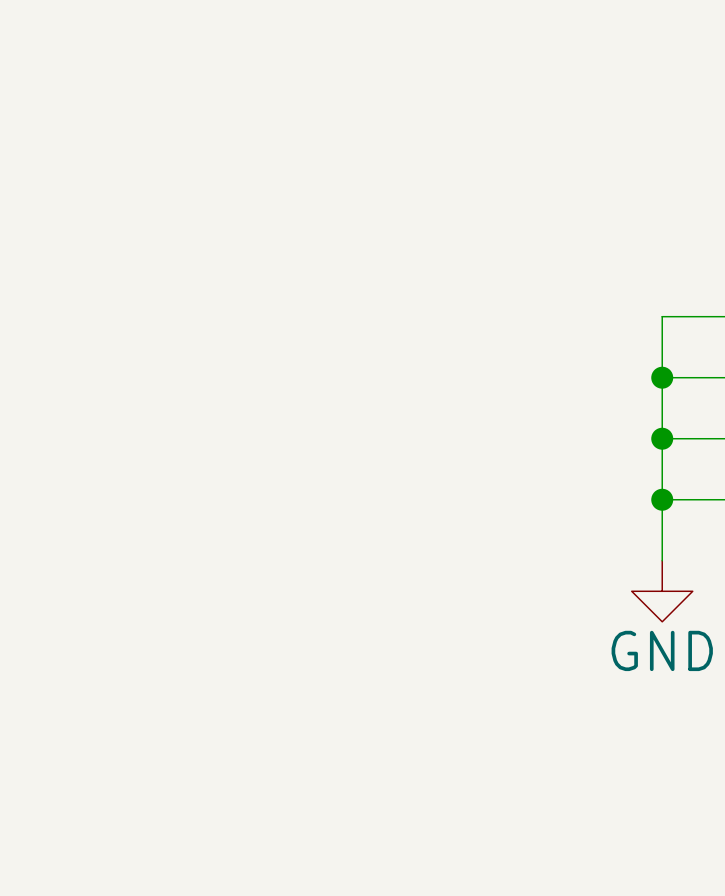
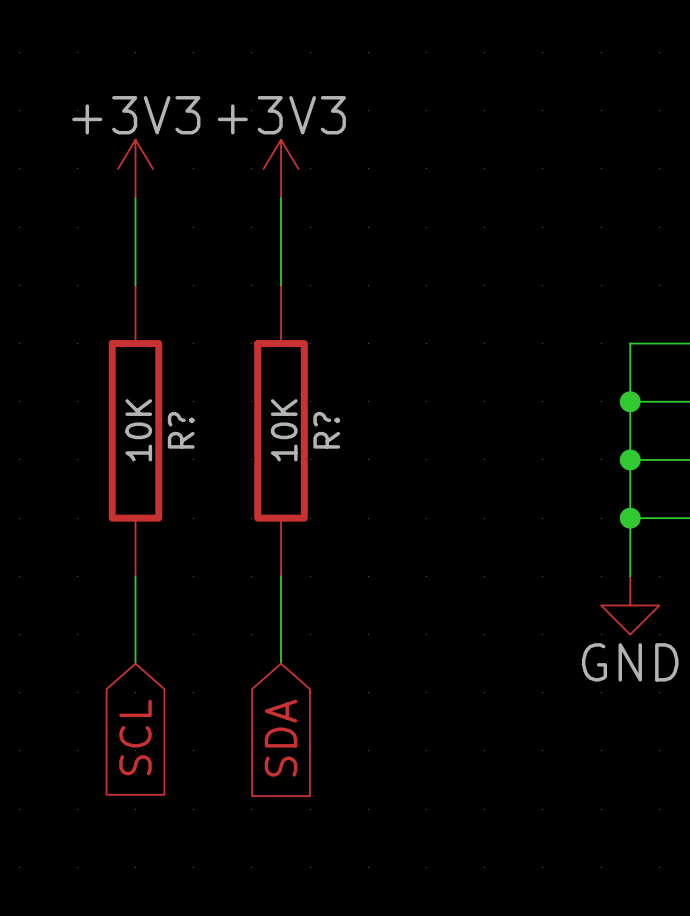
power symbol: none -> +3V3 (135, 168)
power symbol: none -> +3V3 (281, 168)
wire: none -> (135, 198) (135, 285)
wire: none -> (281, 198) (281, 285)
R?: none -> 10K (135, 430)
R?: none -> 10K (281, 430)
wire: none -> (135, 576) (135, 663)
wire: none -> (281, 576) (281, 663)
global label: none -> SCL (135, 737)
global label: none -> SDA (281, 738)

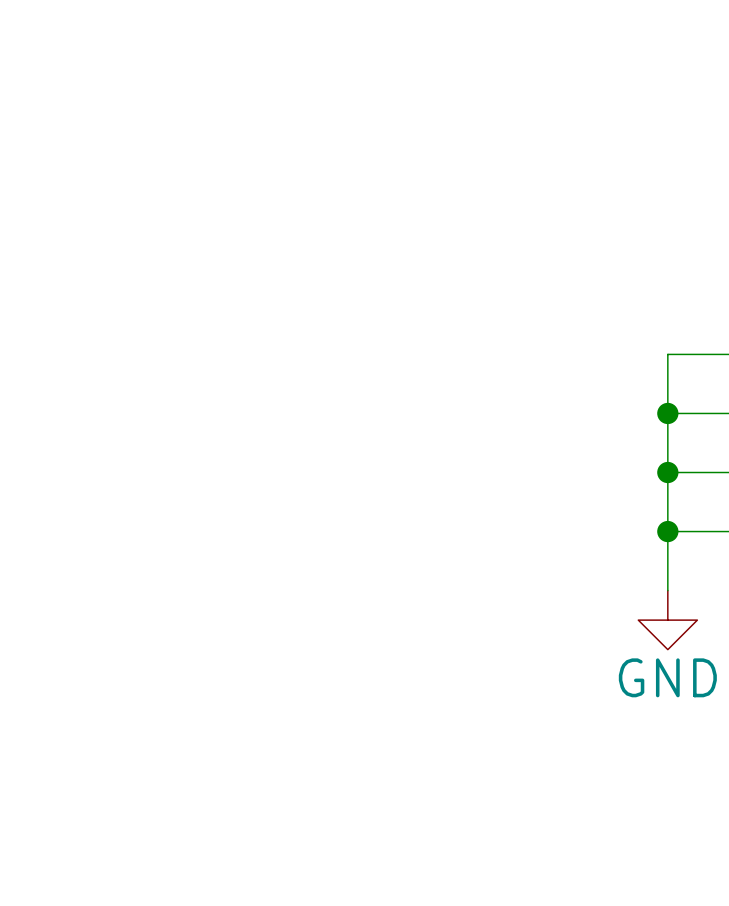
power symbol: +3V3 (135, 168) -> none
power symbol: +3V3 (281, 168) -> none
wire: (135, 198) (135, 285) -> none
wire: (281, 198) (281, 285) -> none
R?: 10K (135, 430) -> none
R?: 10K (281, 430) -> none
wire: (135, 576) (135, 663) -> none
wire: (281, 576) (281, 663) -> none
global label: SCL (135, 737) -> none
global label: SDA (281, 738) -> none

